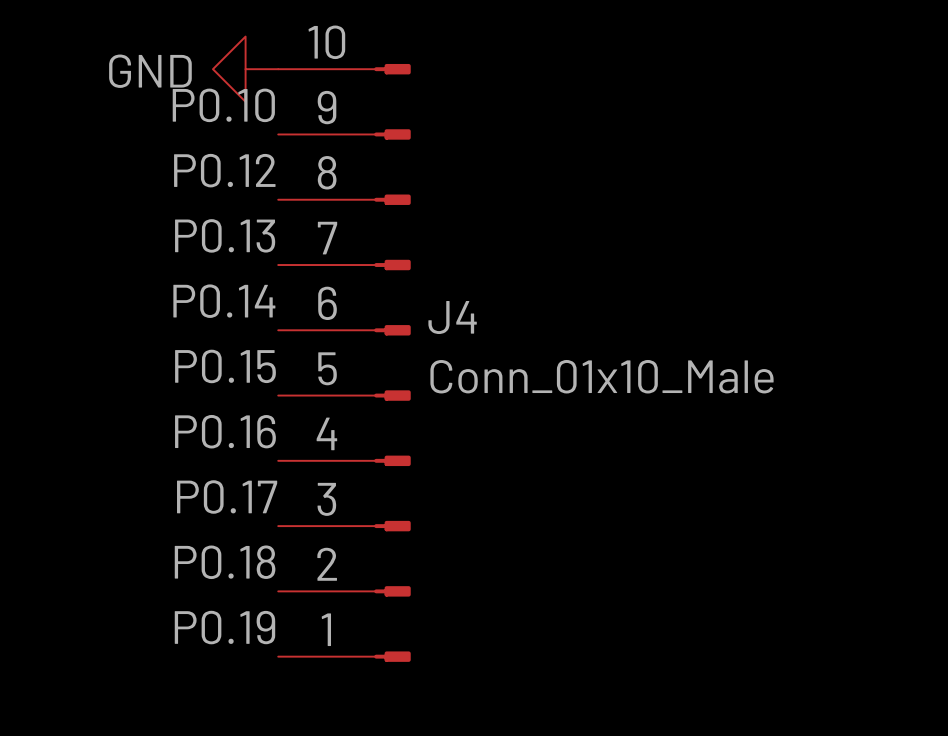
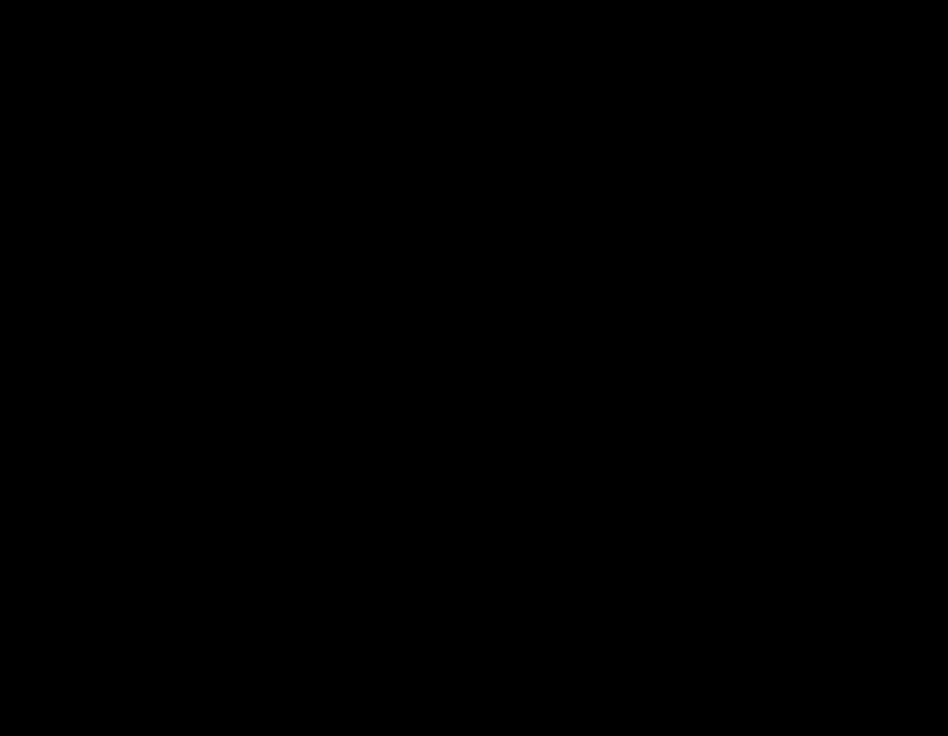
power symbol: GND (245, 69) -> none
label: P0.10 (223, 105) -> none
label: P0.12 (224, 170) -> none
label: P0.13 (225, 235) -> none
label: P0.14 (224, 301) -> none
J4: Conn_01x10_Male (344, 362) -> none
label: P0.15 (225, 366) -> none
label: P0.16 (225, 431) -> none
label: P0.17 (227, 497) -> none
label: P0.18 (225, 562) -> none
label: P0.19 (224, 627) -> none

